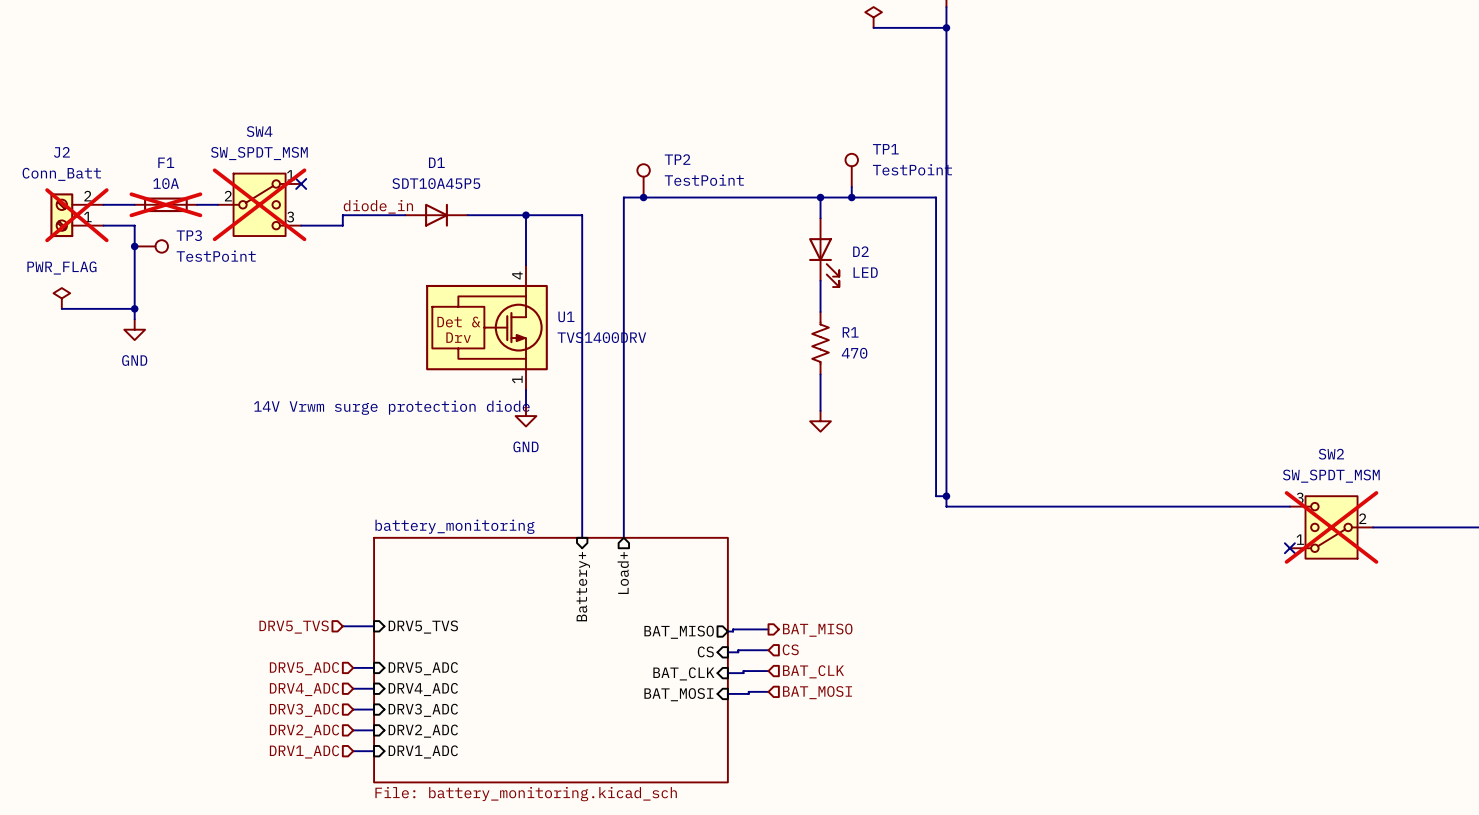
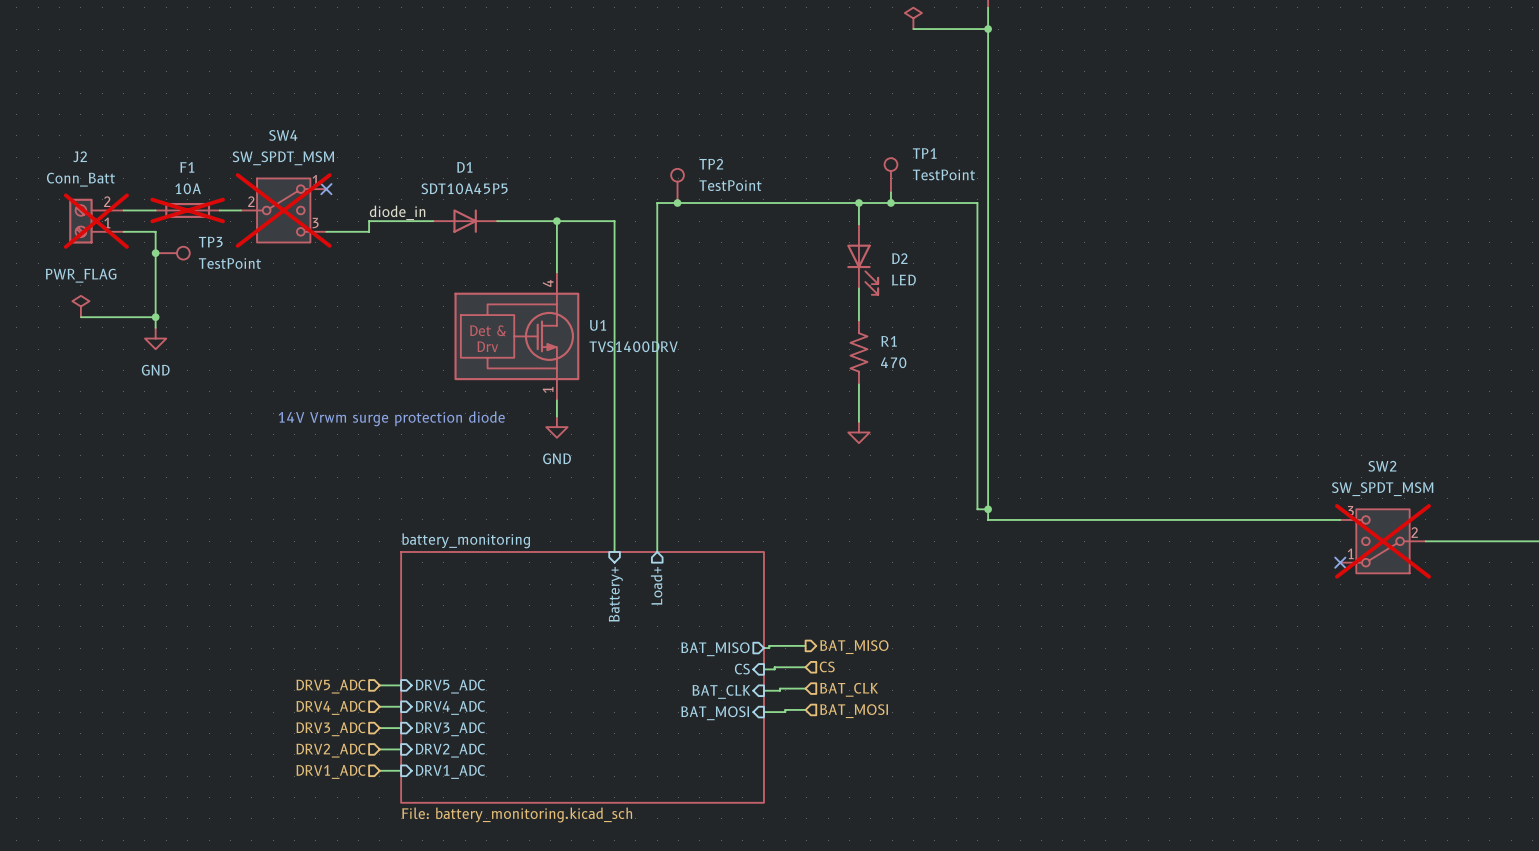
wire: (342, 626) (374, 626) -> none
hierarchical label: DRV5_TVS (294, 627) -> none
sheet pin: DRV5_TVS (423, 627) -> none

